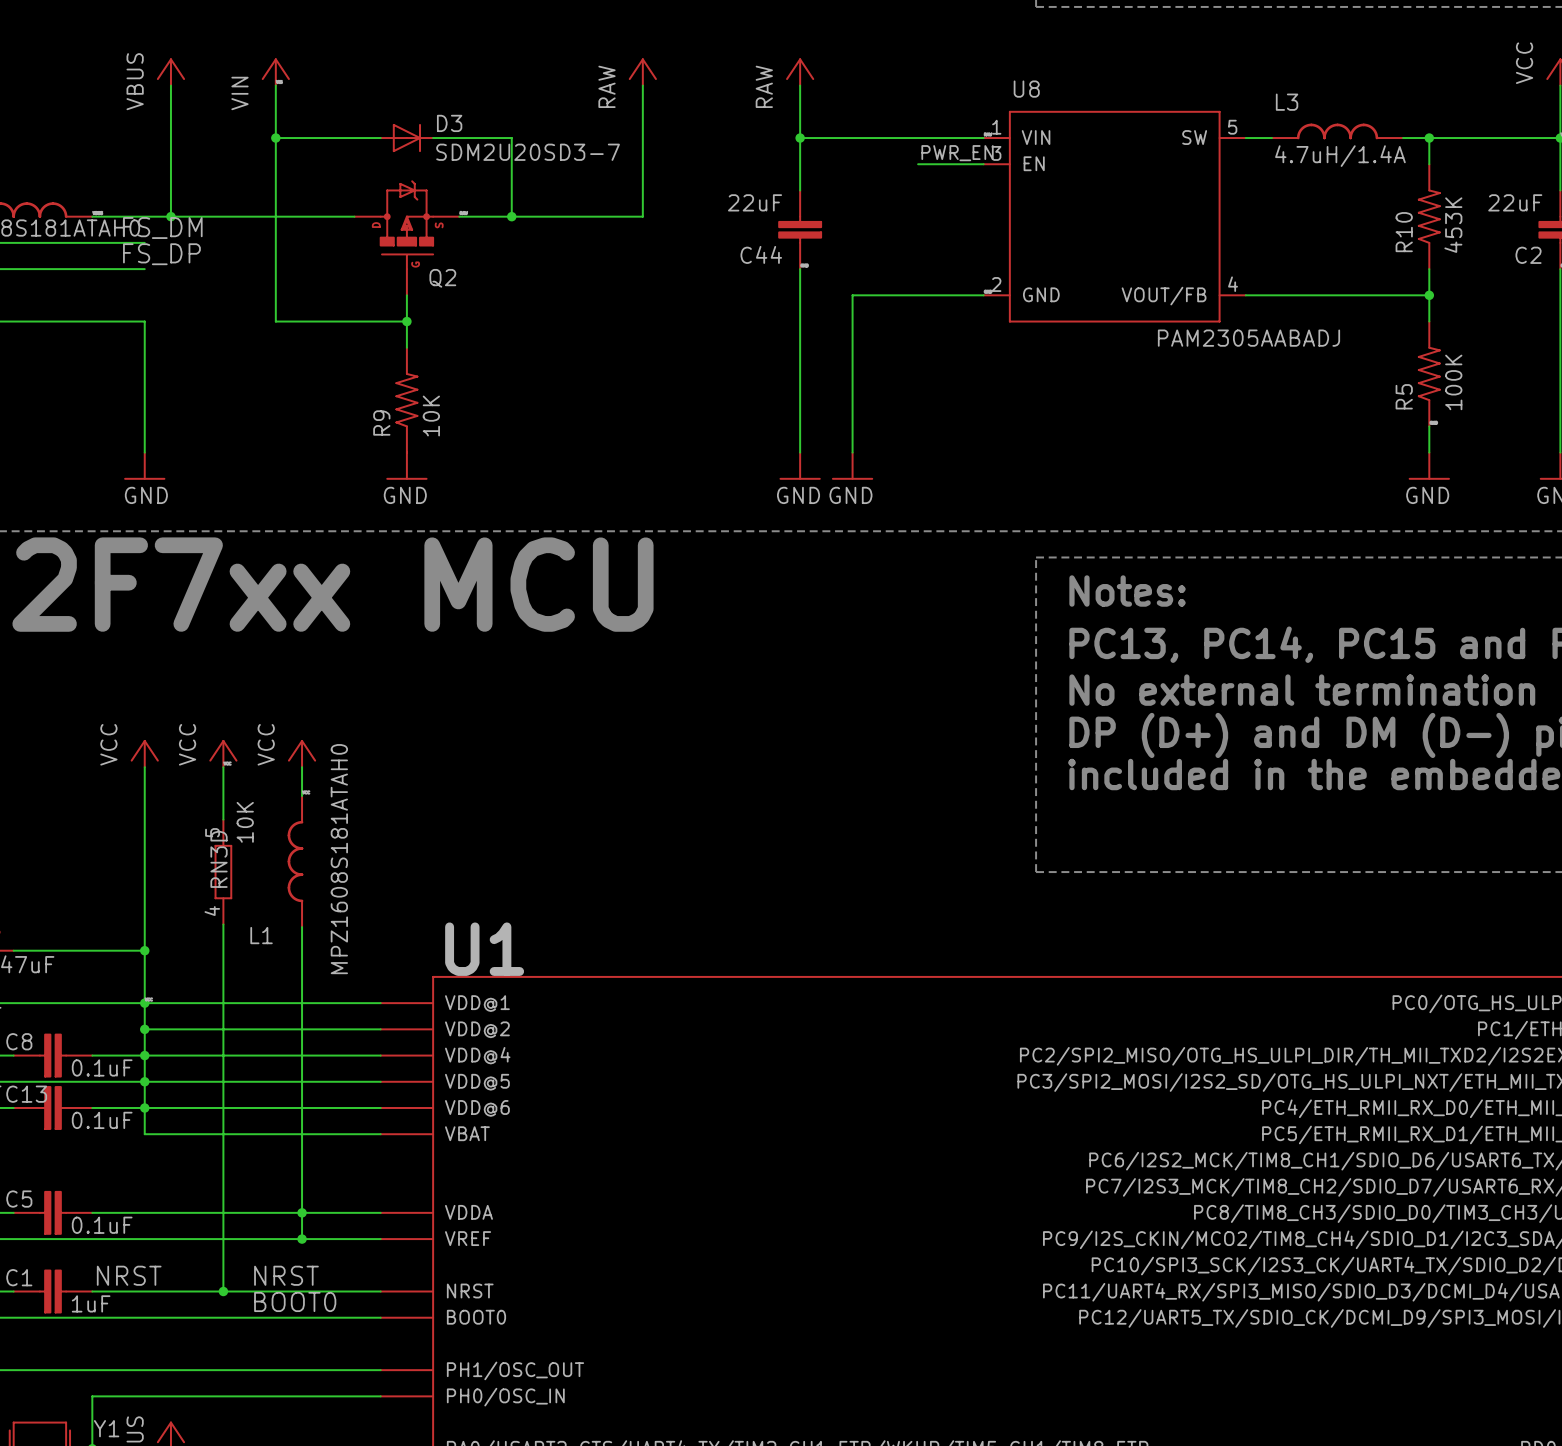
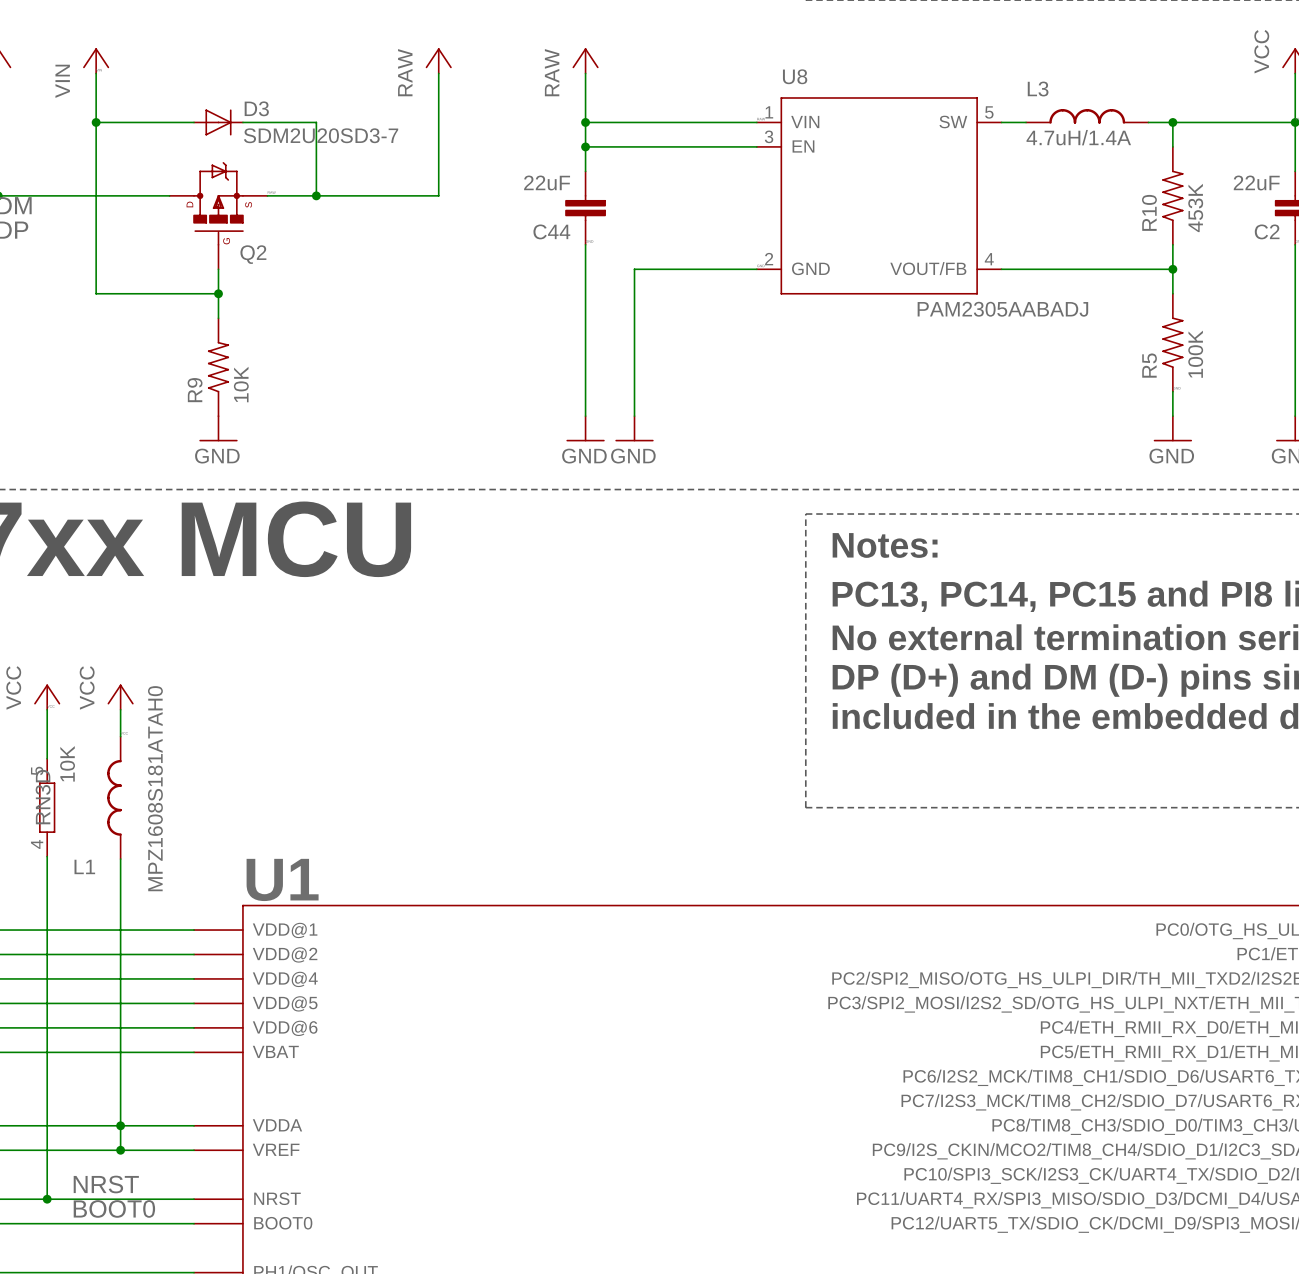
label: PWR_EN (957, 153) -> none
wire: none -> (585, 146) (695, 146)
junction: none -> (585, 146)

